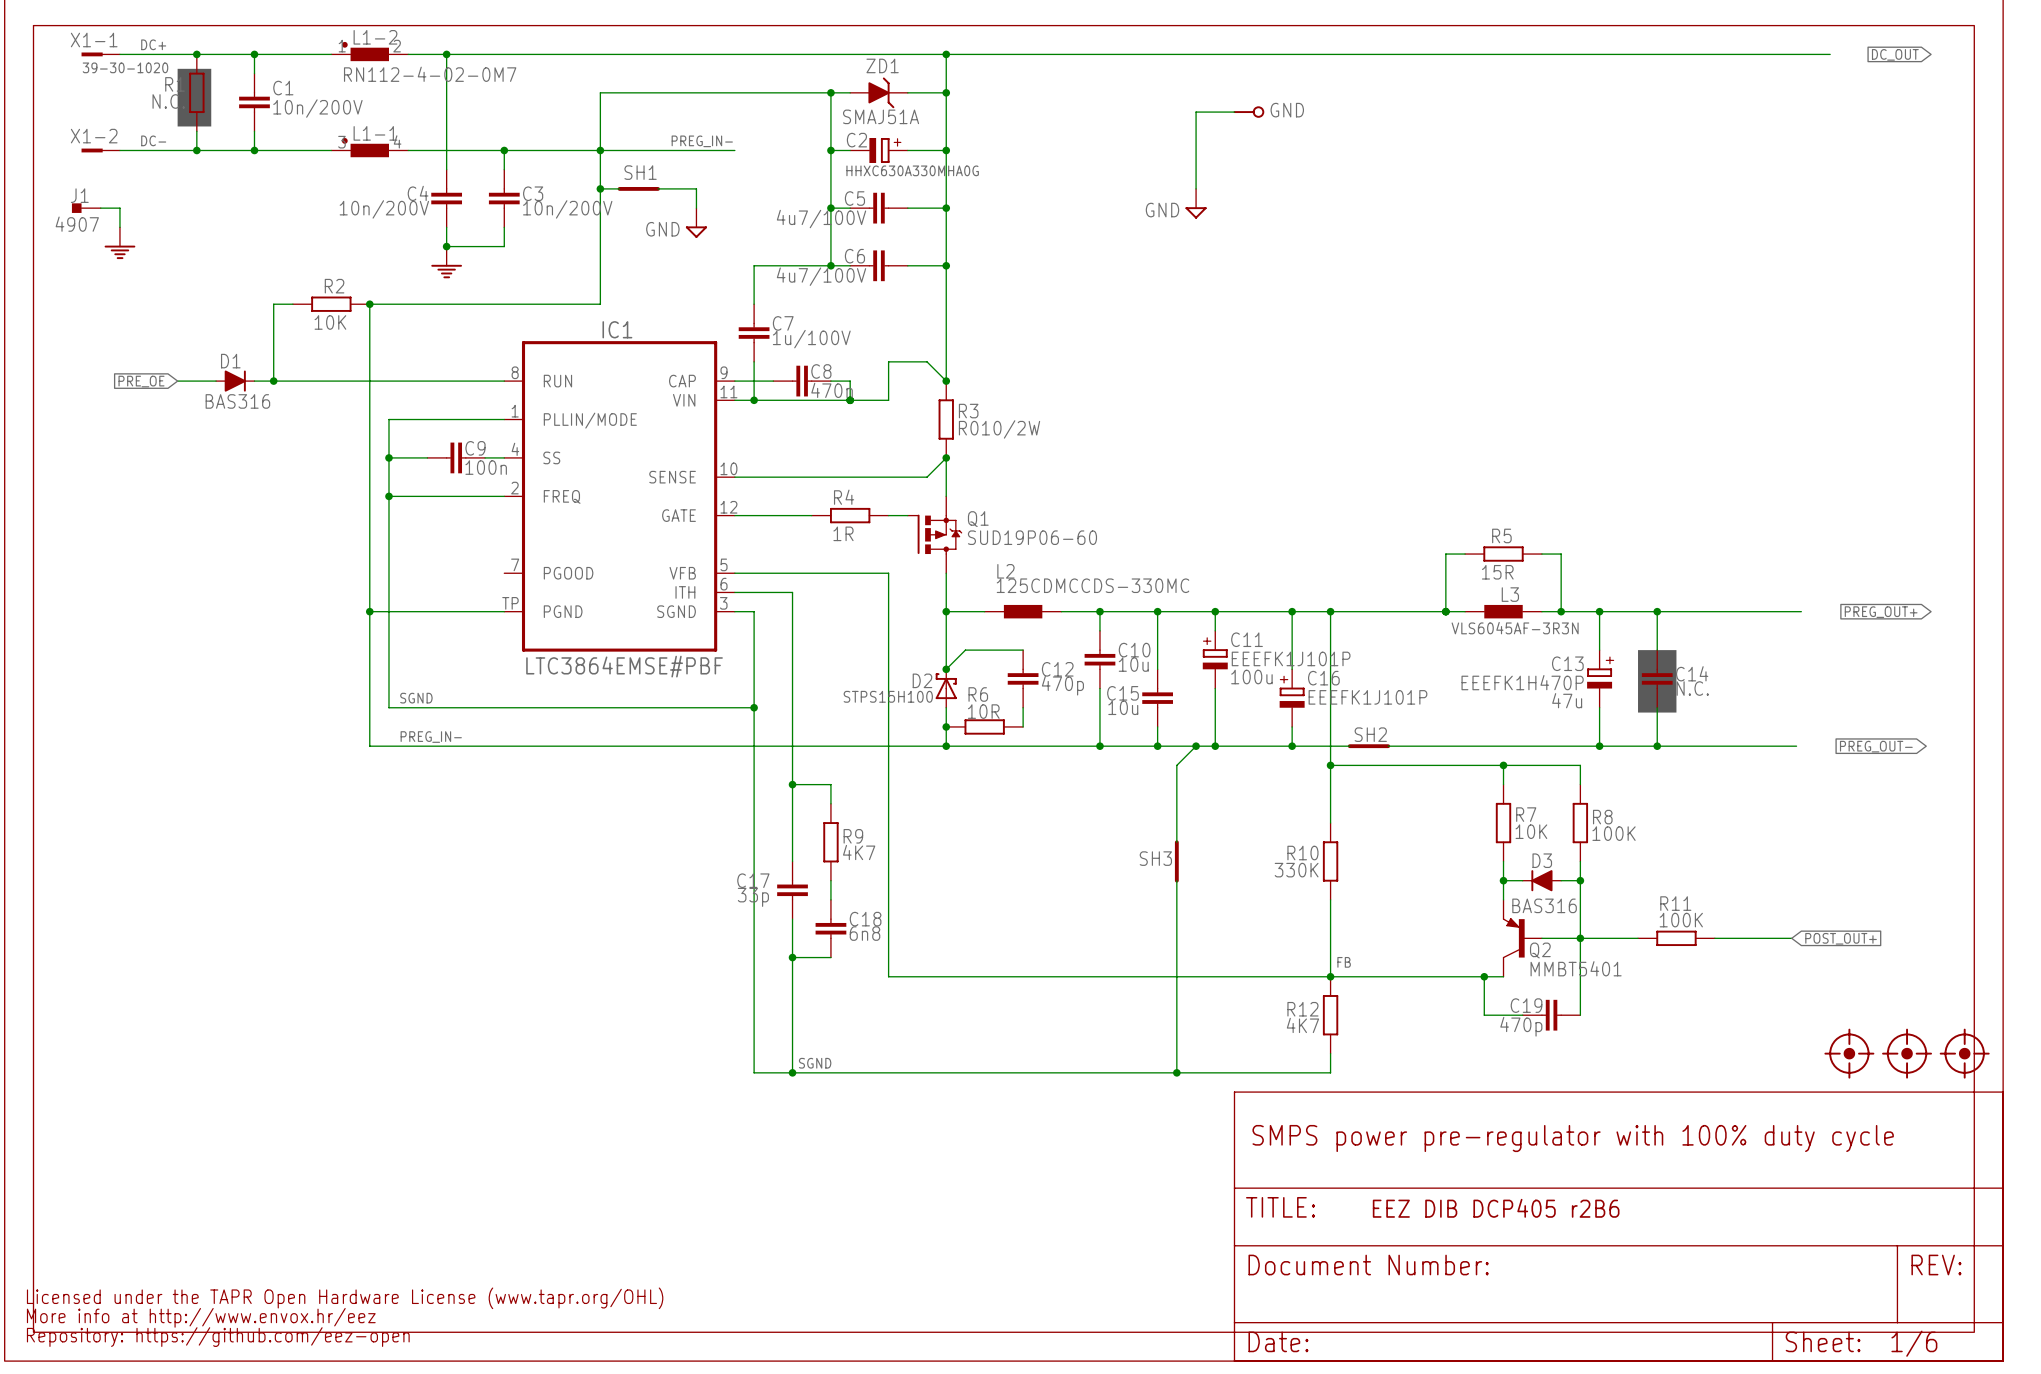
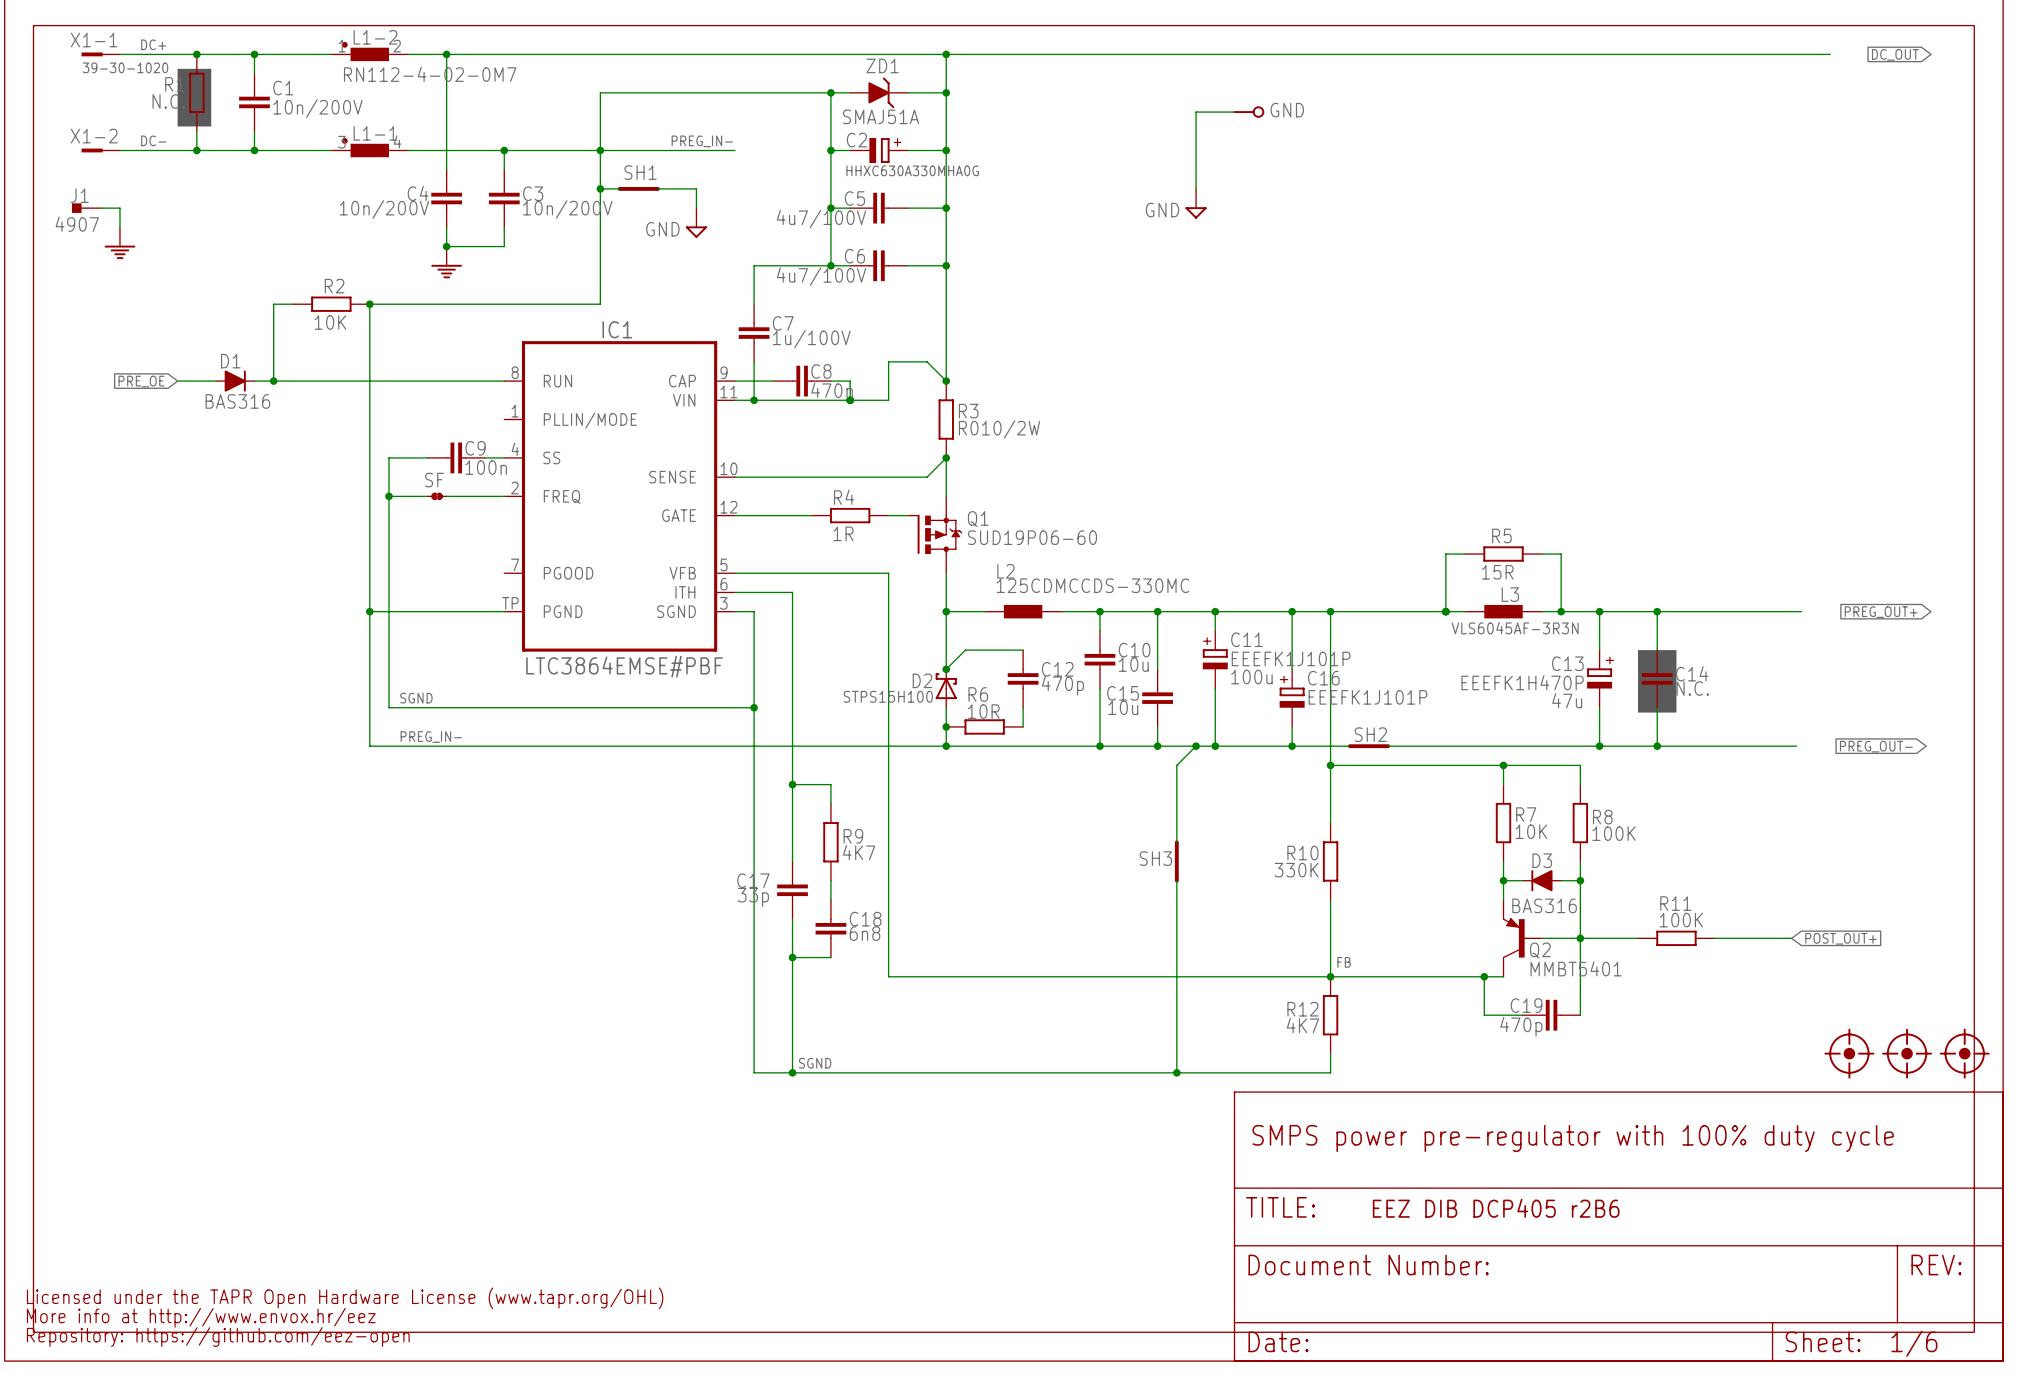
wire: (504, 419) (388, 419) (388, 457) -> none
junction: (388, 457) -> none
SF: none -> (437, 496)

